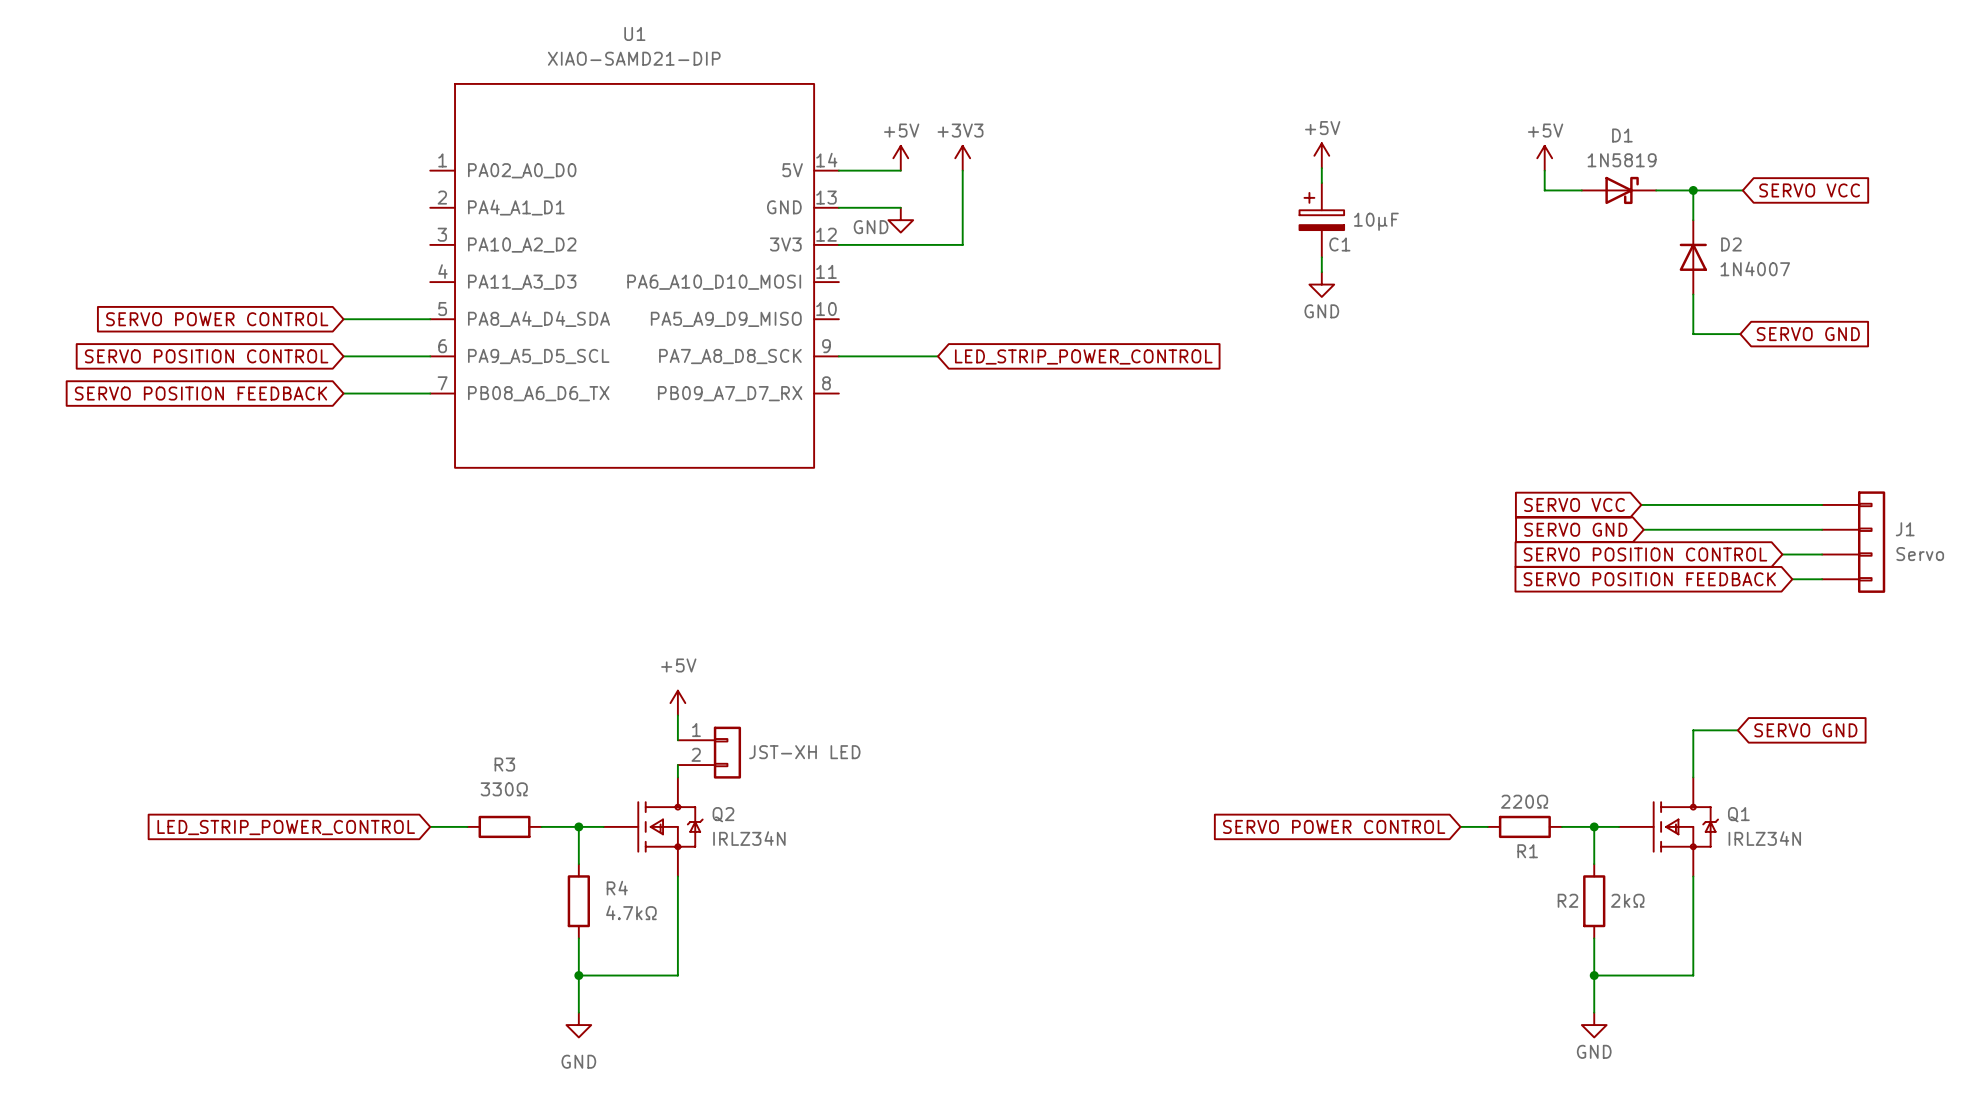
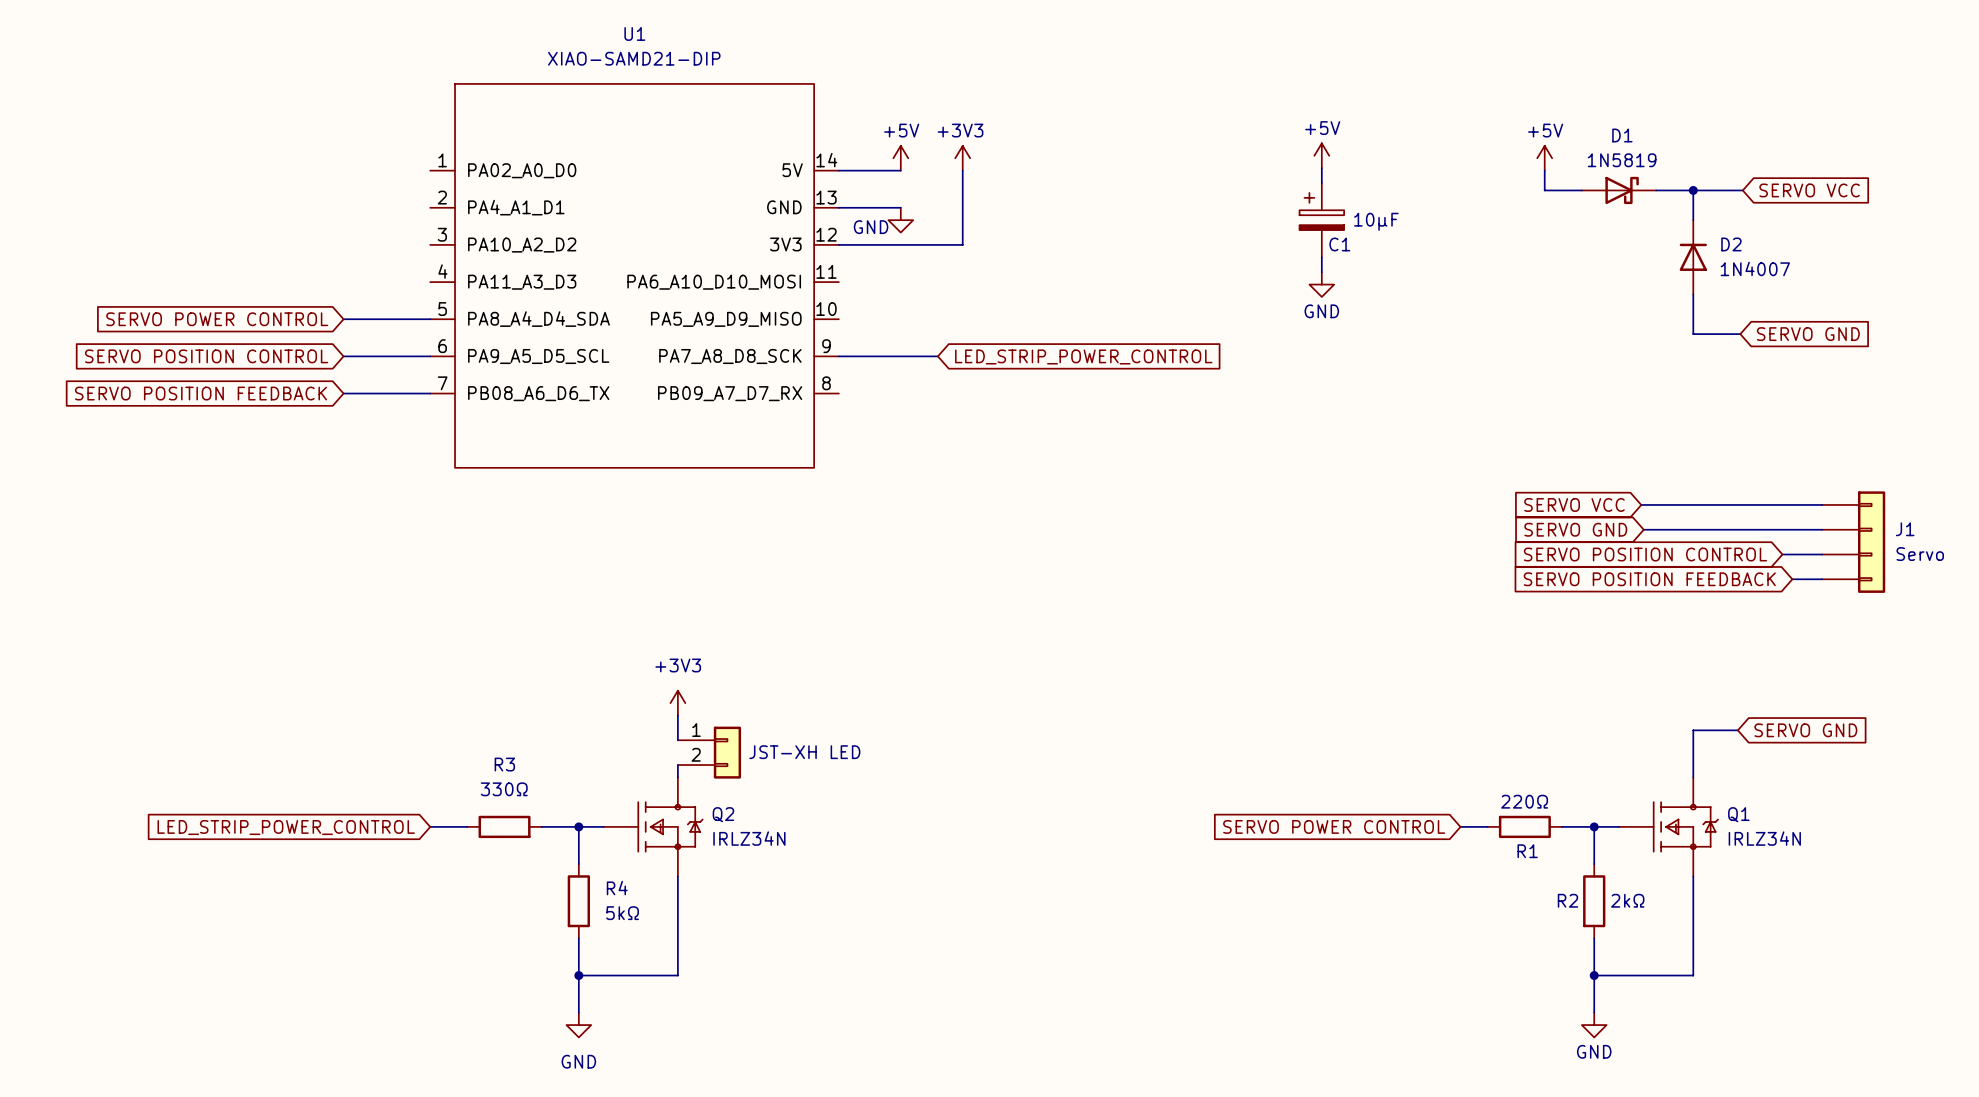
power symbol: +5V (677, 703) -> +3V3 (677, 703)
R4 value: 4.7kΩ (631, 912) -> 5kΩ (622, 913)

